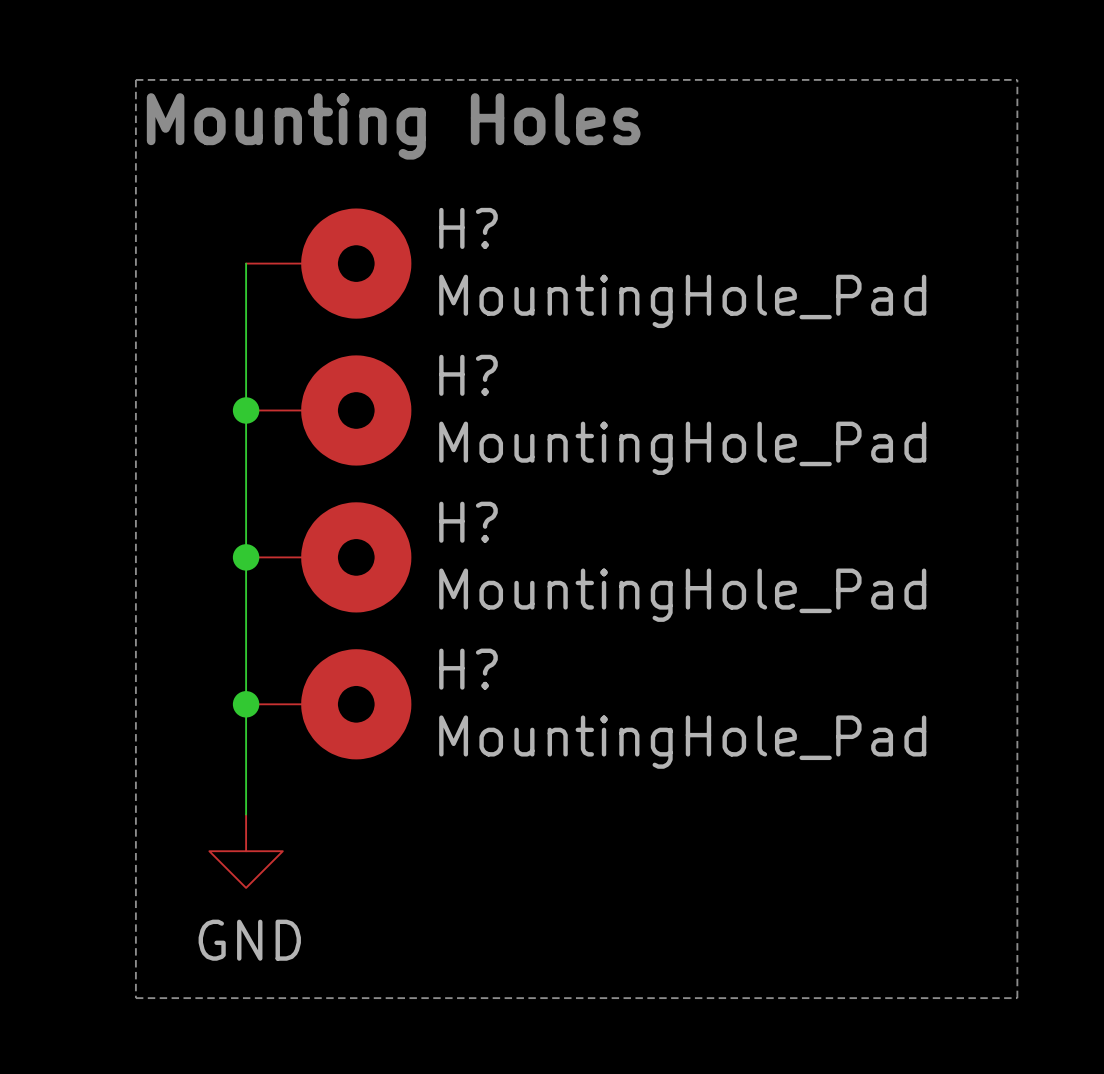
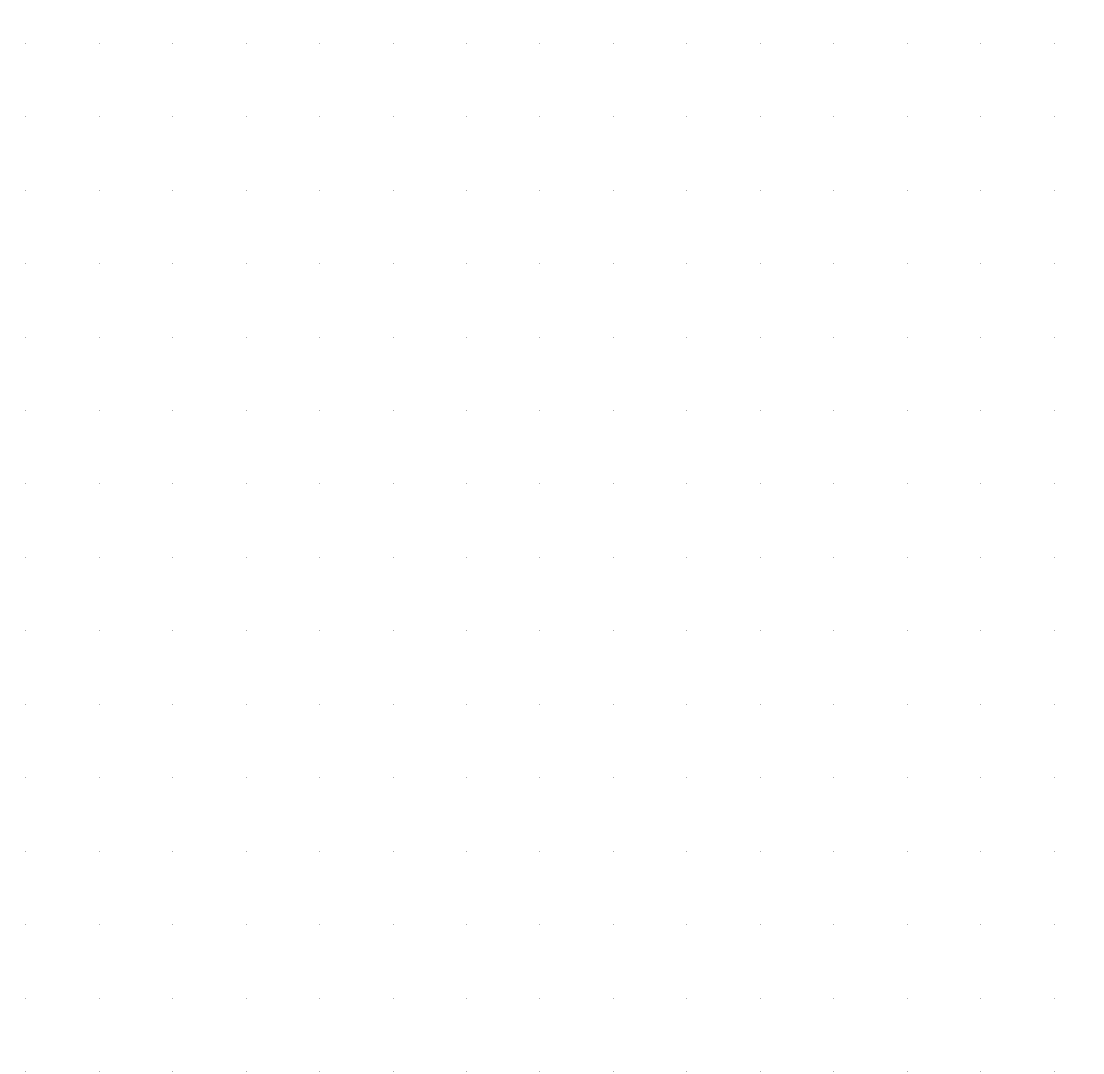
line: (135, 79) (135, 998) (1017, 998) (1017, 79) (135, 79) -> none
text: Mounting Holes (393, 126) -> none
wire: (246, 263) (246, 814) -> none
H?: MountingHole_Pad (328, 263) -> none
junction: (246, 410) -> none
H?: MountingHole_Pad (328, 410) -> none
junction: (246, 557) -> none
H?: MountingHole_Pad (328, 557) -> none
junction: (246, 704) -> none
H?: MountingHole_Pad (328, 704) -> none
power symbol: GND (246, 851) -> none

